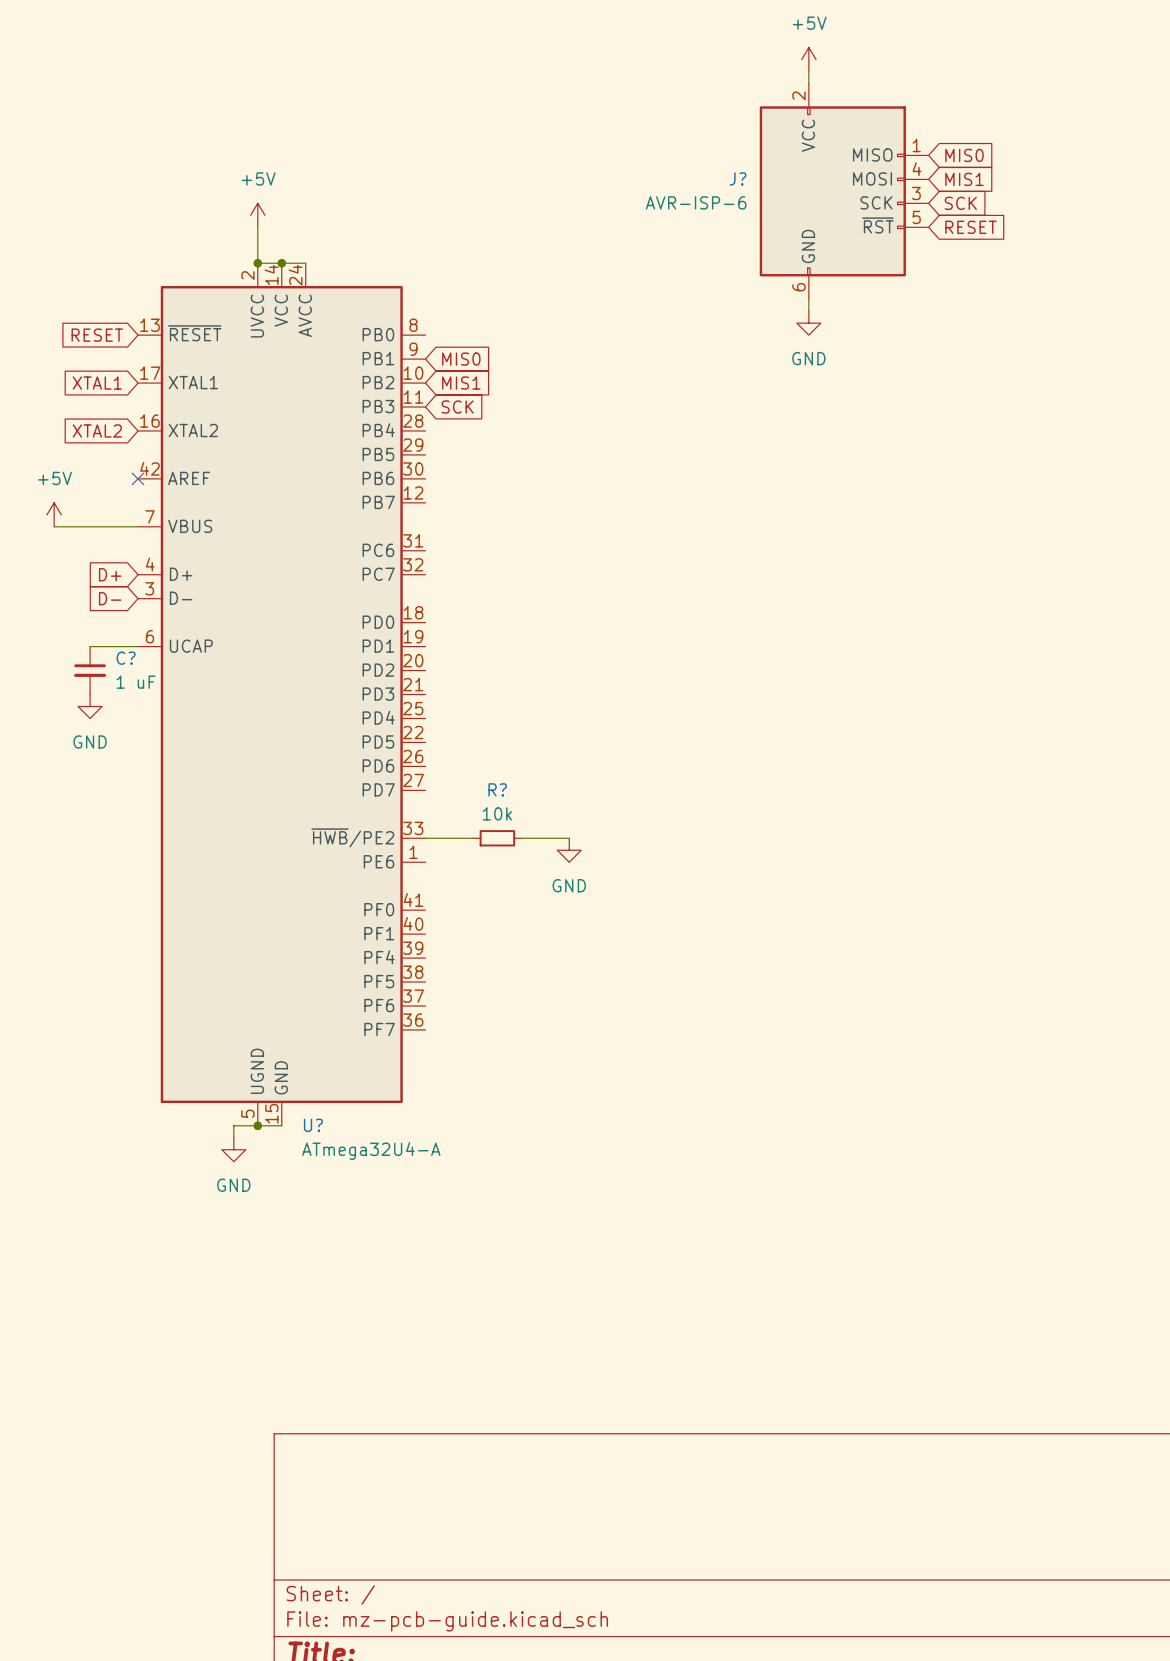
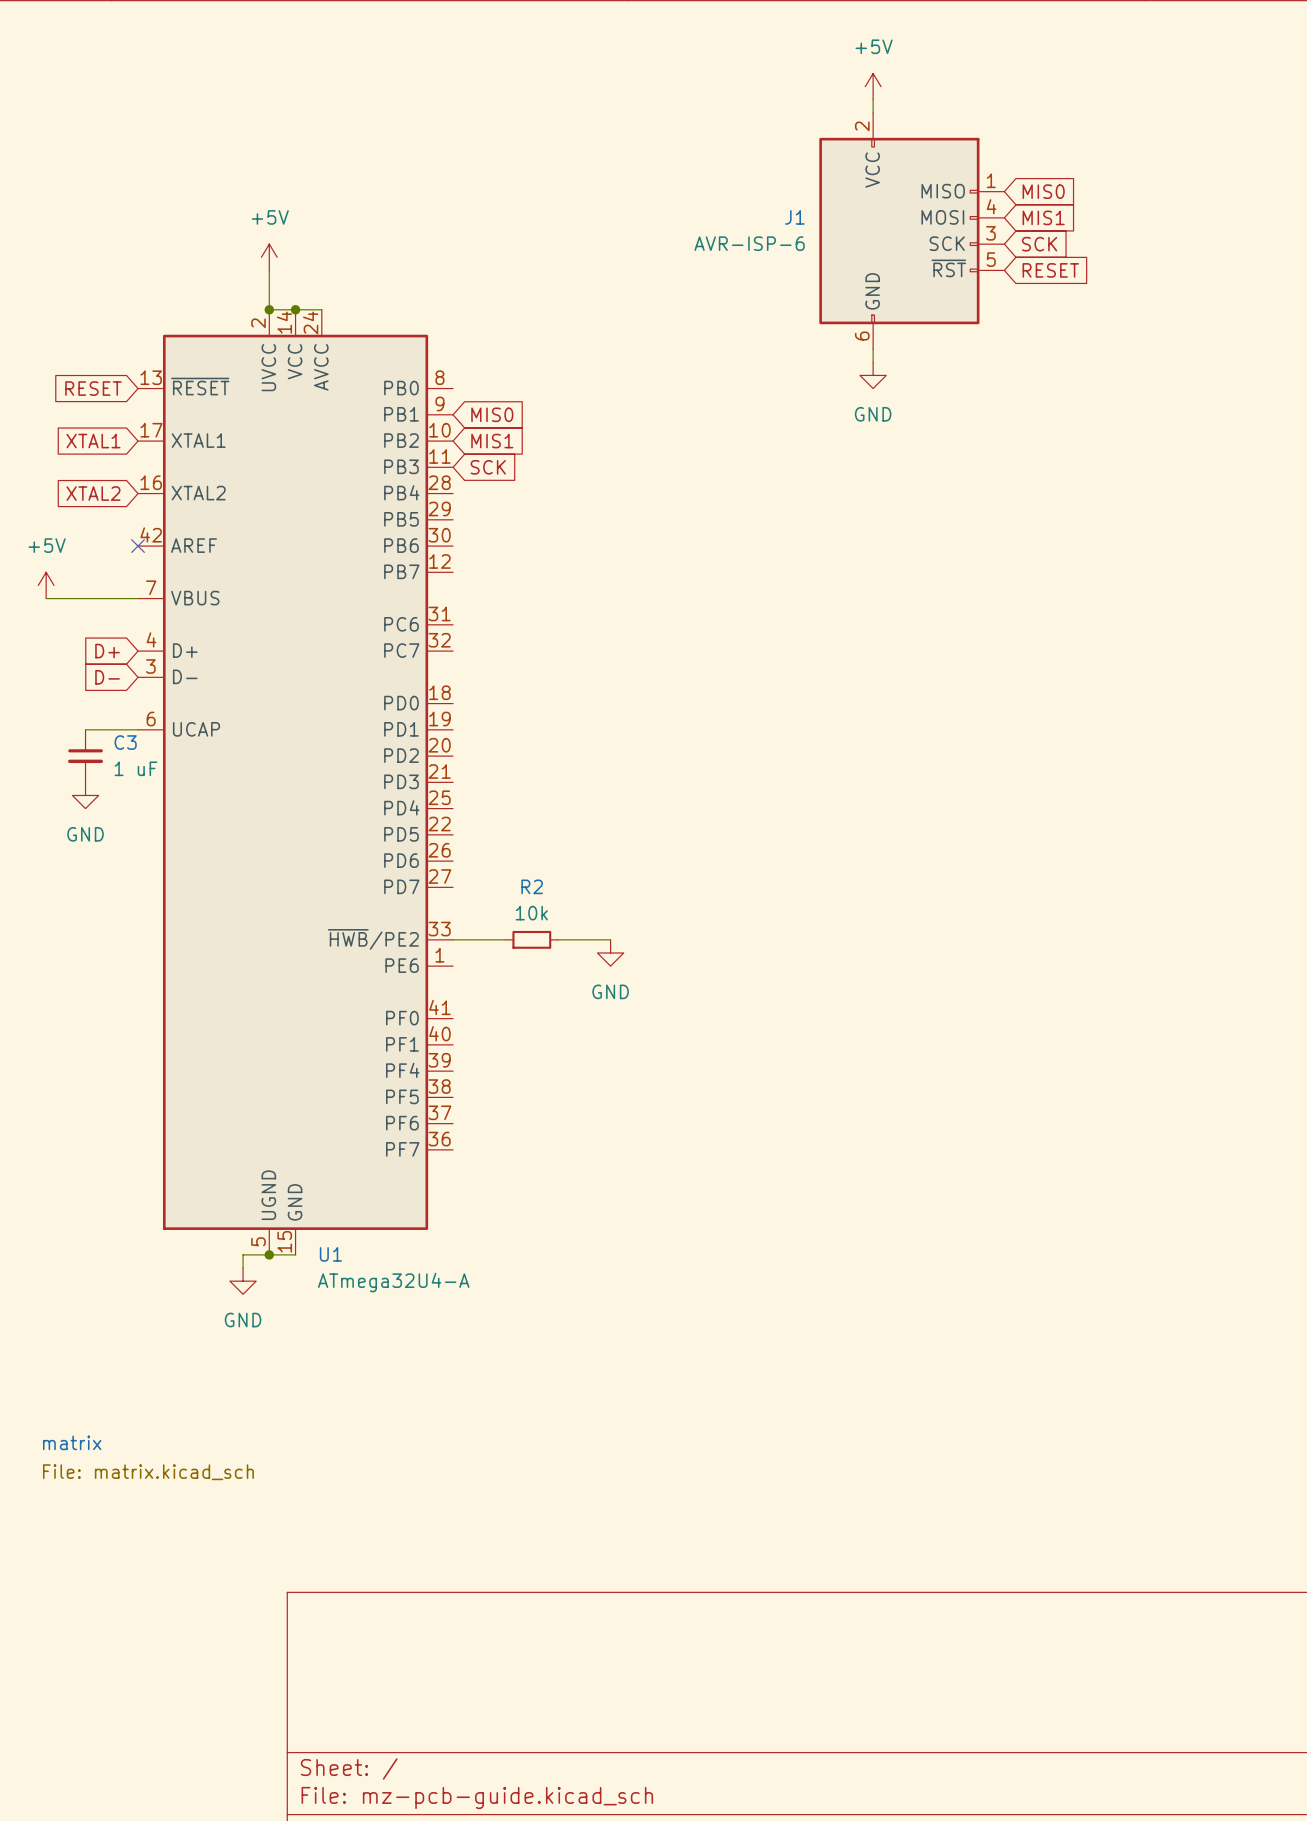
J? name: J? (738, 178) -> J1 (794, 217)
C? name: C? (126, 658) -> C3 (125, 742)
R? name: R? (497, 789) -> R2 (532, 886)
U? name: U? (313, 1125) -> U1 (330, 1254)
sheet matrix: none -> File: matrix.kicad_sch (39, 1458)

